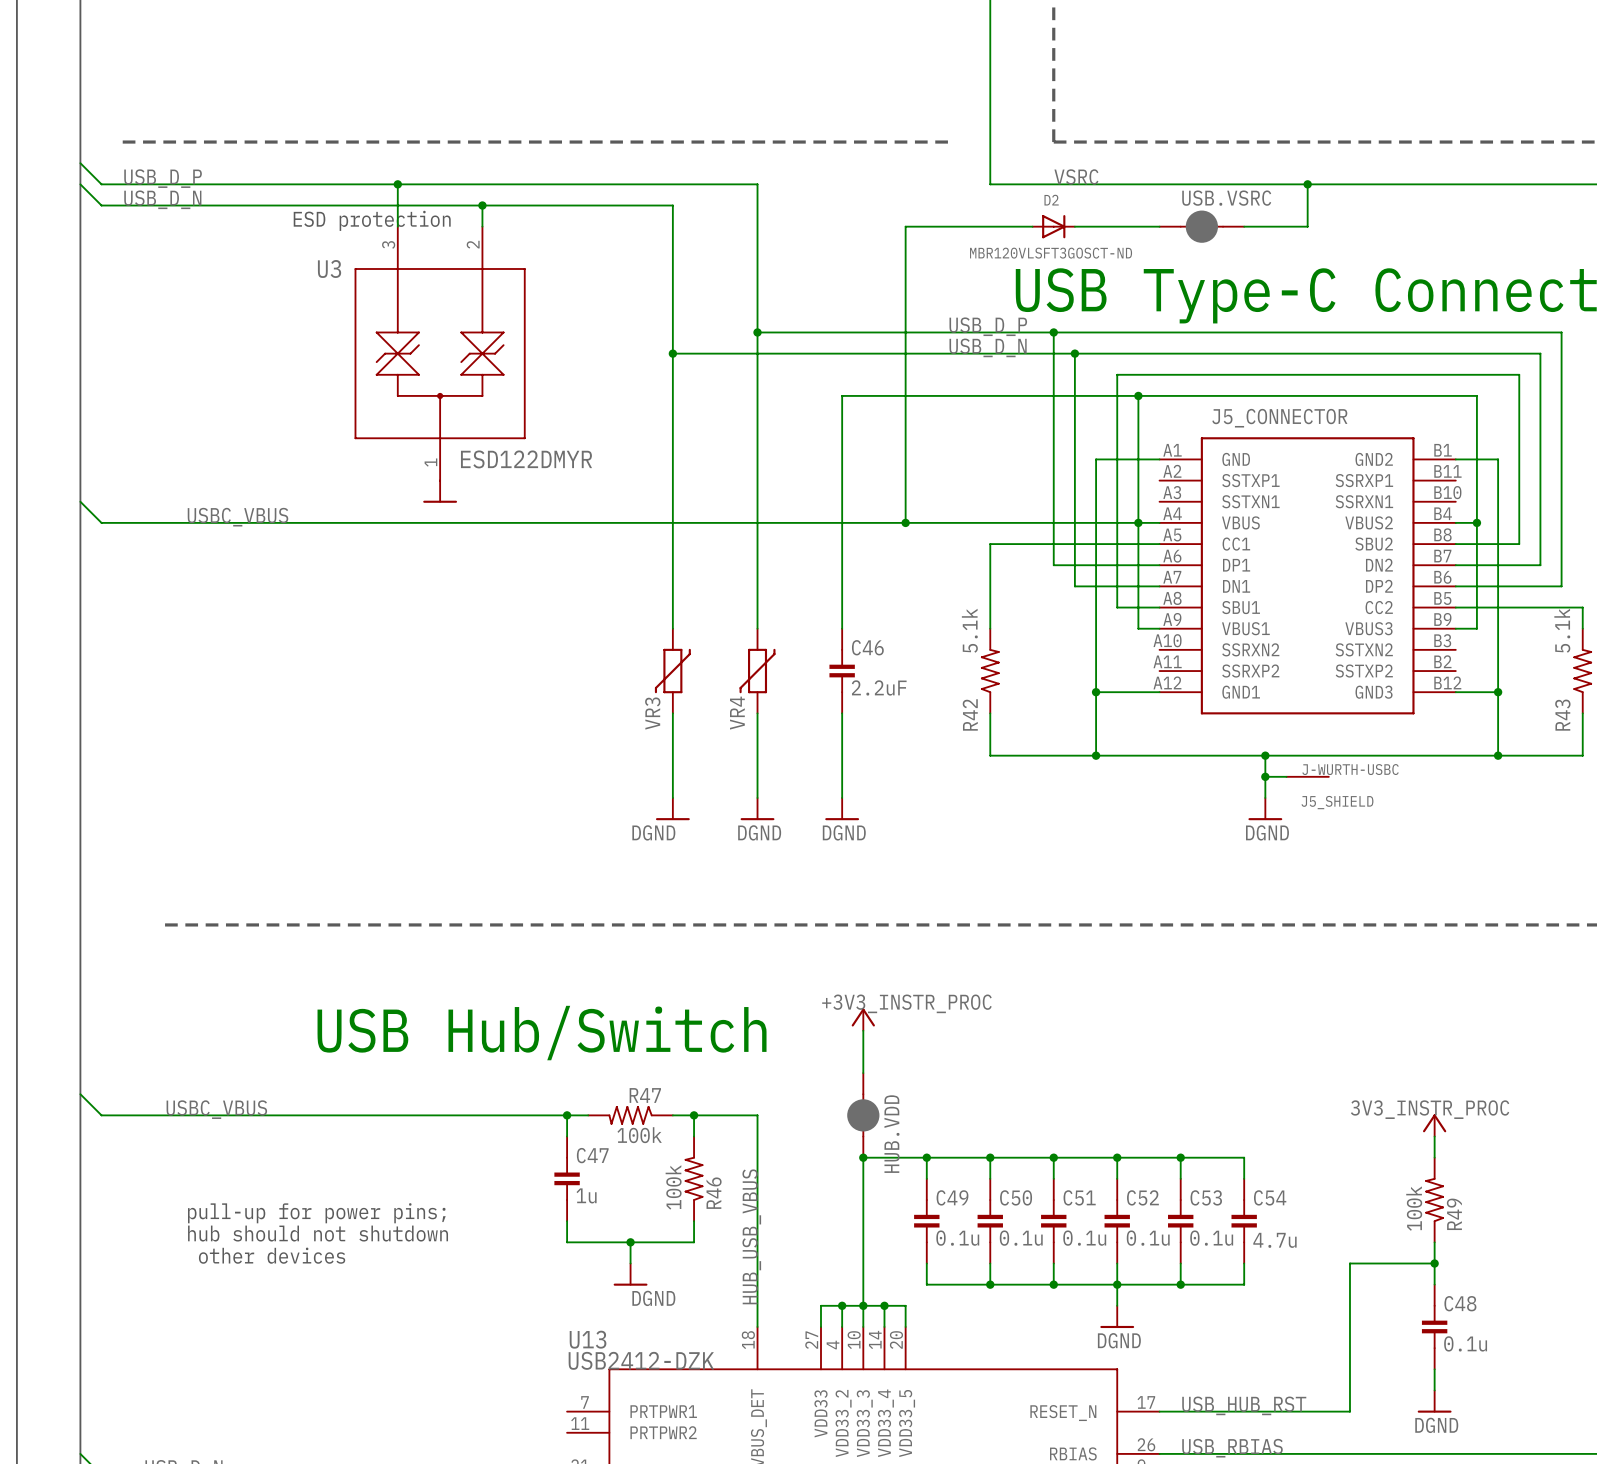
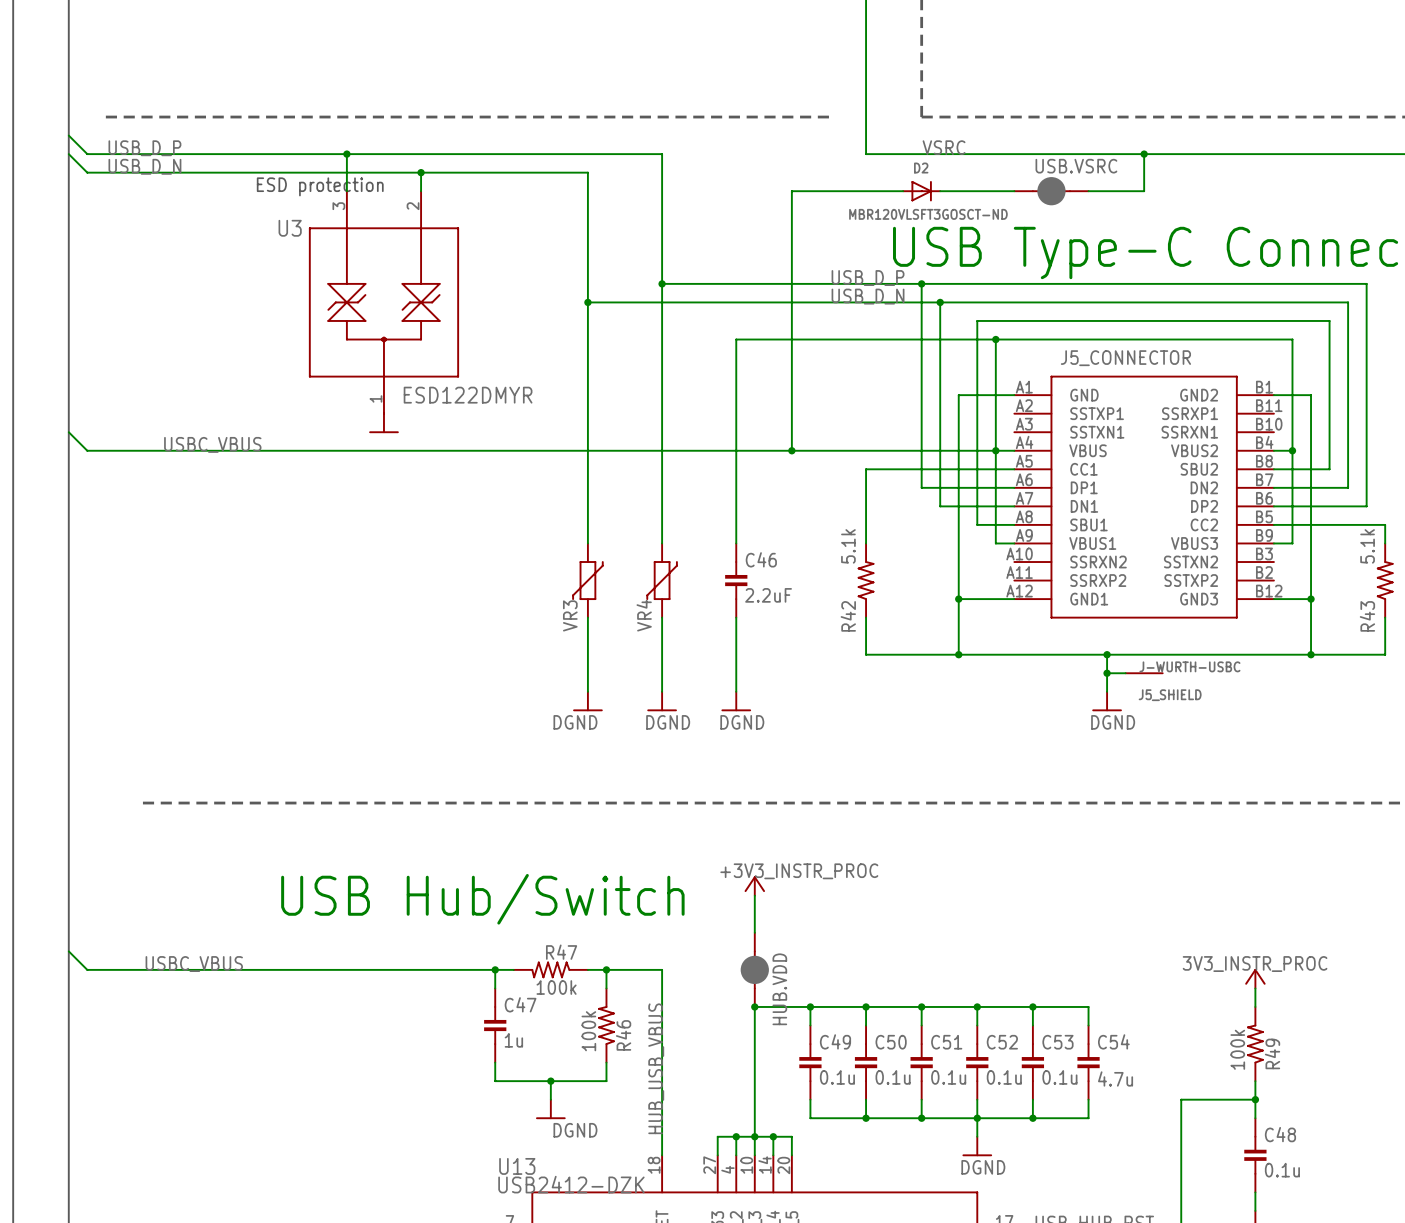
text: pull-up for power pins; (316, 1213) -> none
text: hub should not shutdown (318, 1233) -> none
text: other devices (272, 1255) -> none

